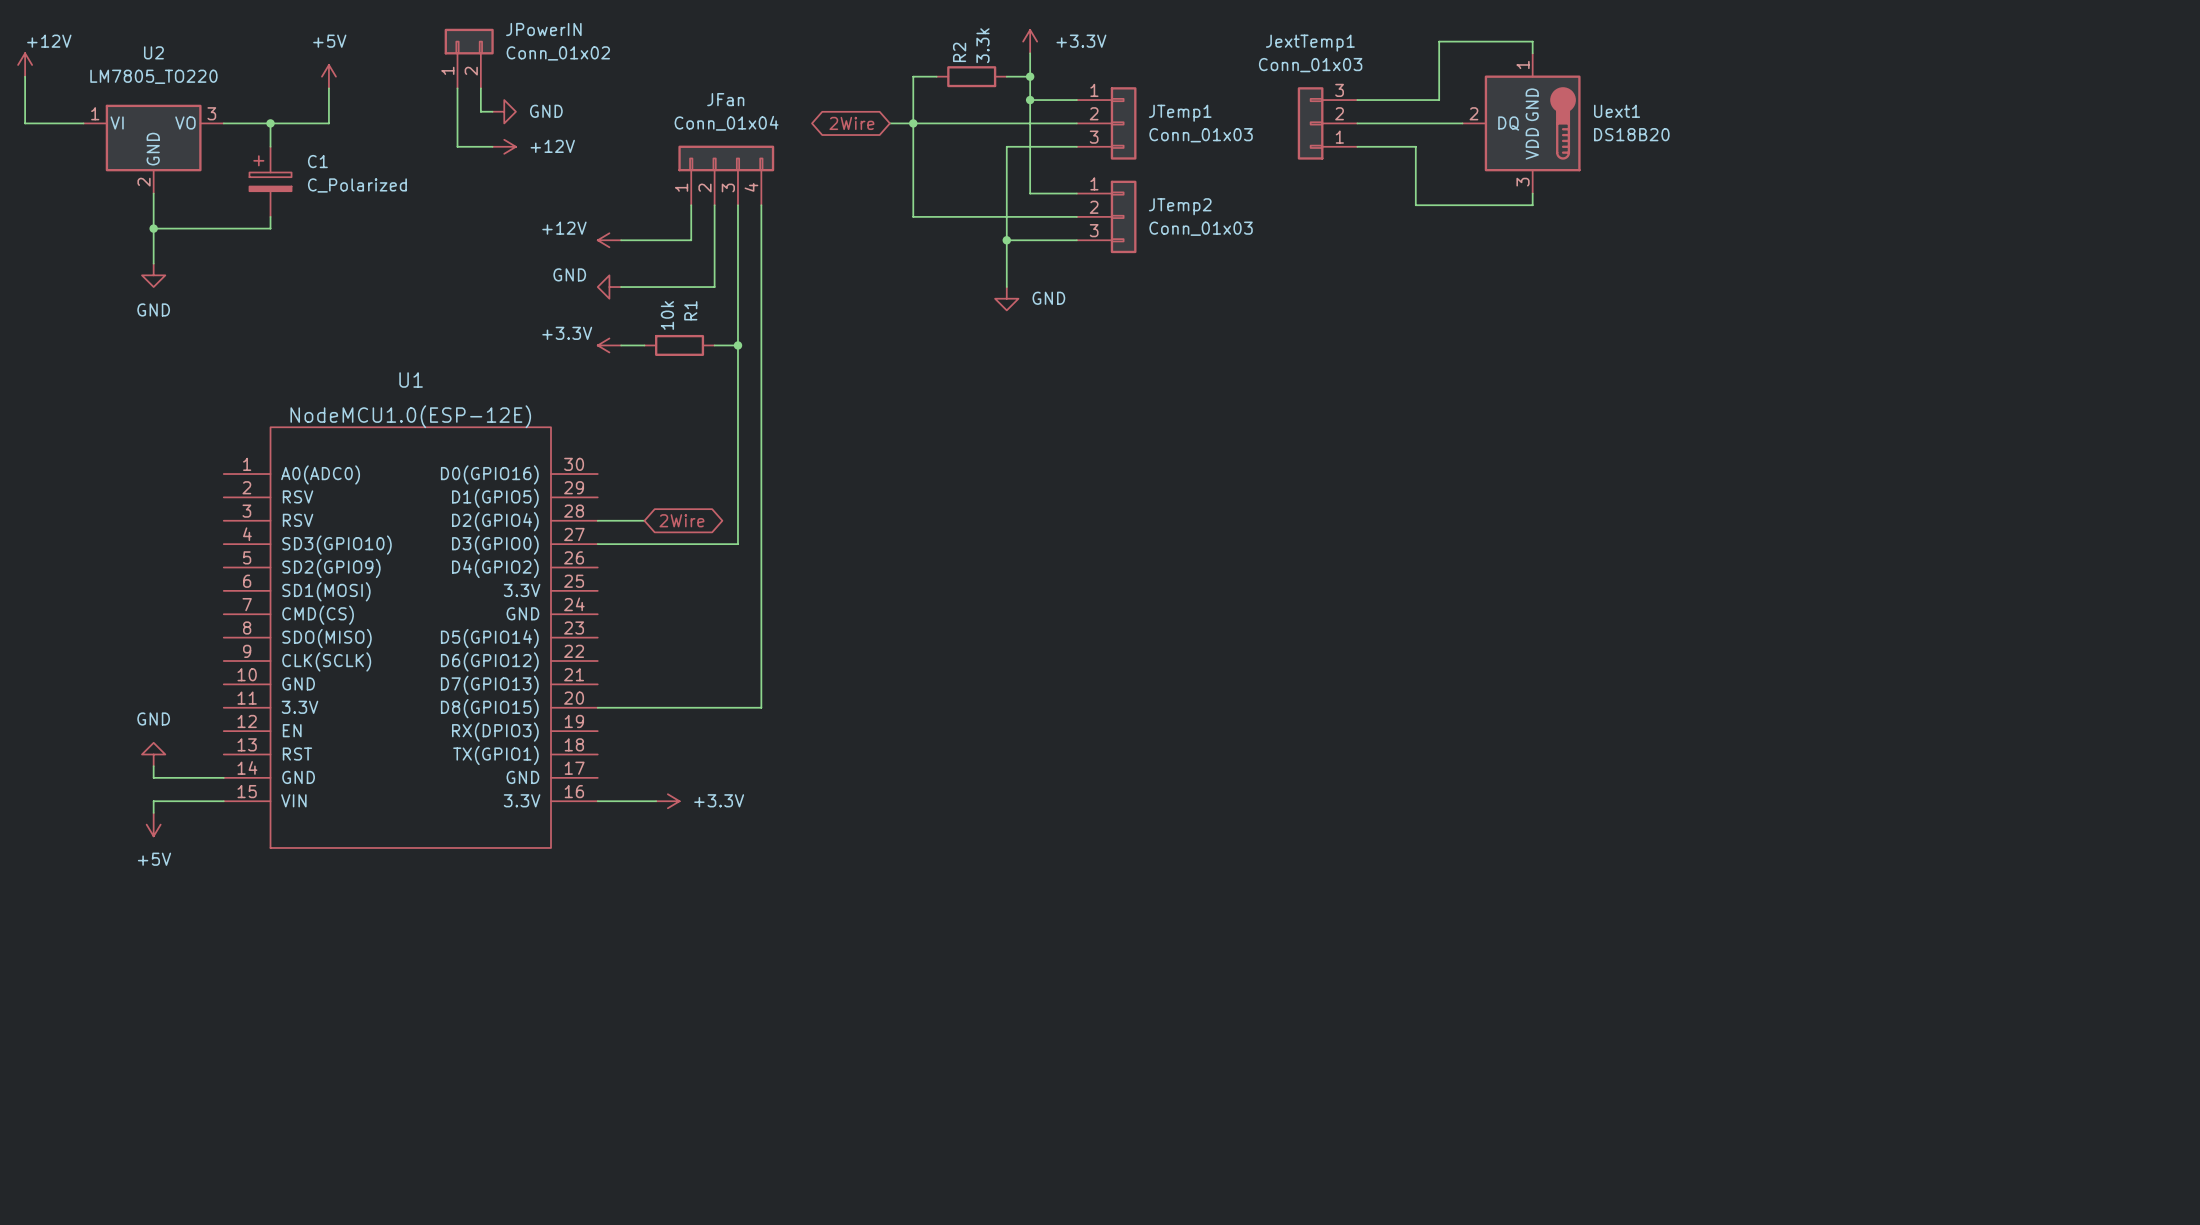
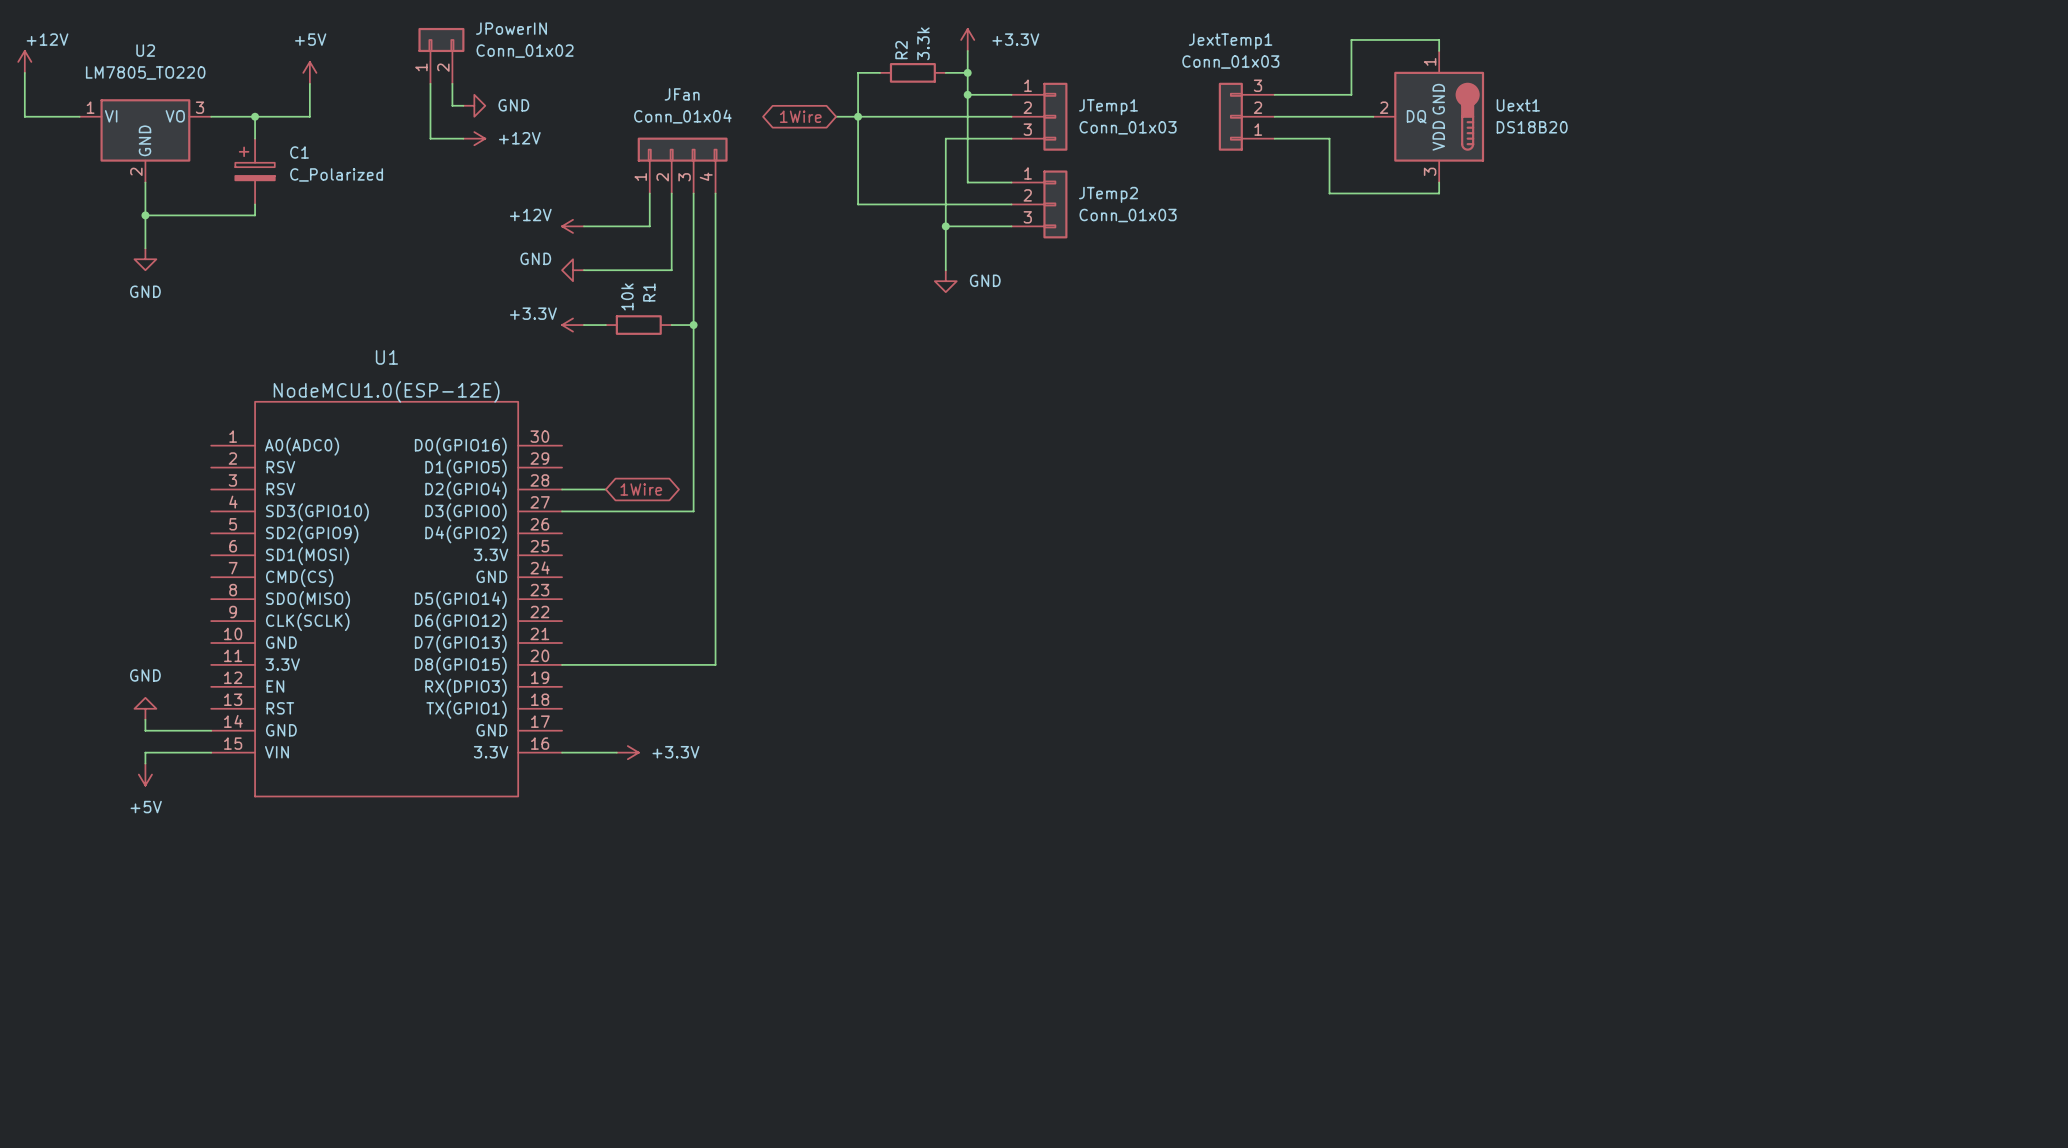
global label: 2Wire (851, 123) -> 1Wire (800, 116)
global label: 2Wire (681, 520) -> 1Wire (641, 489)

